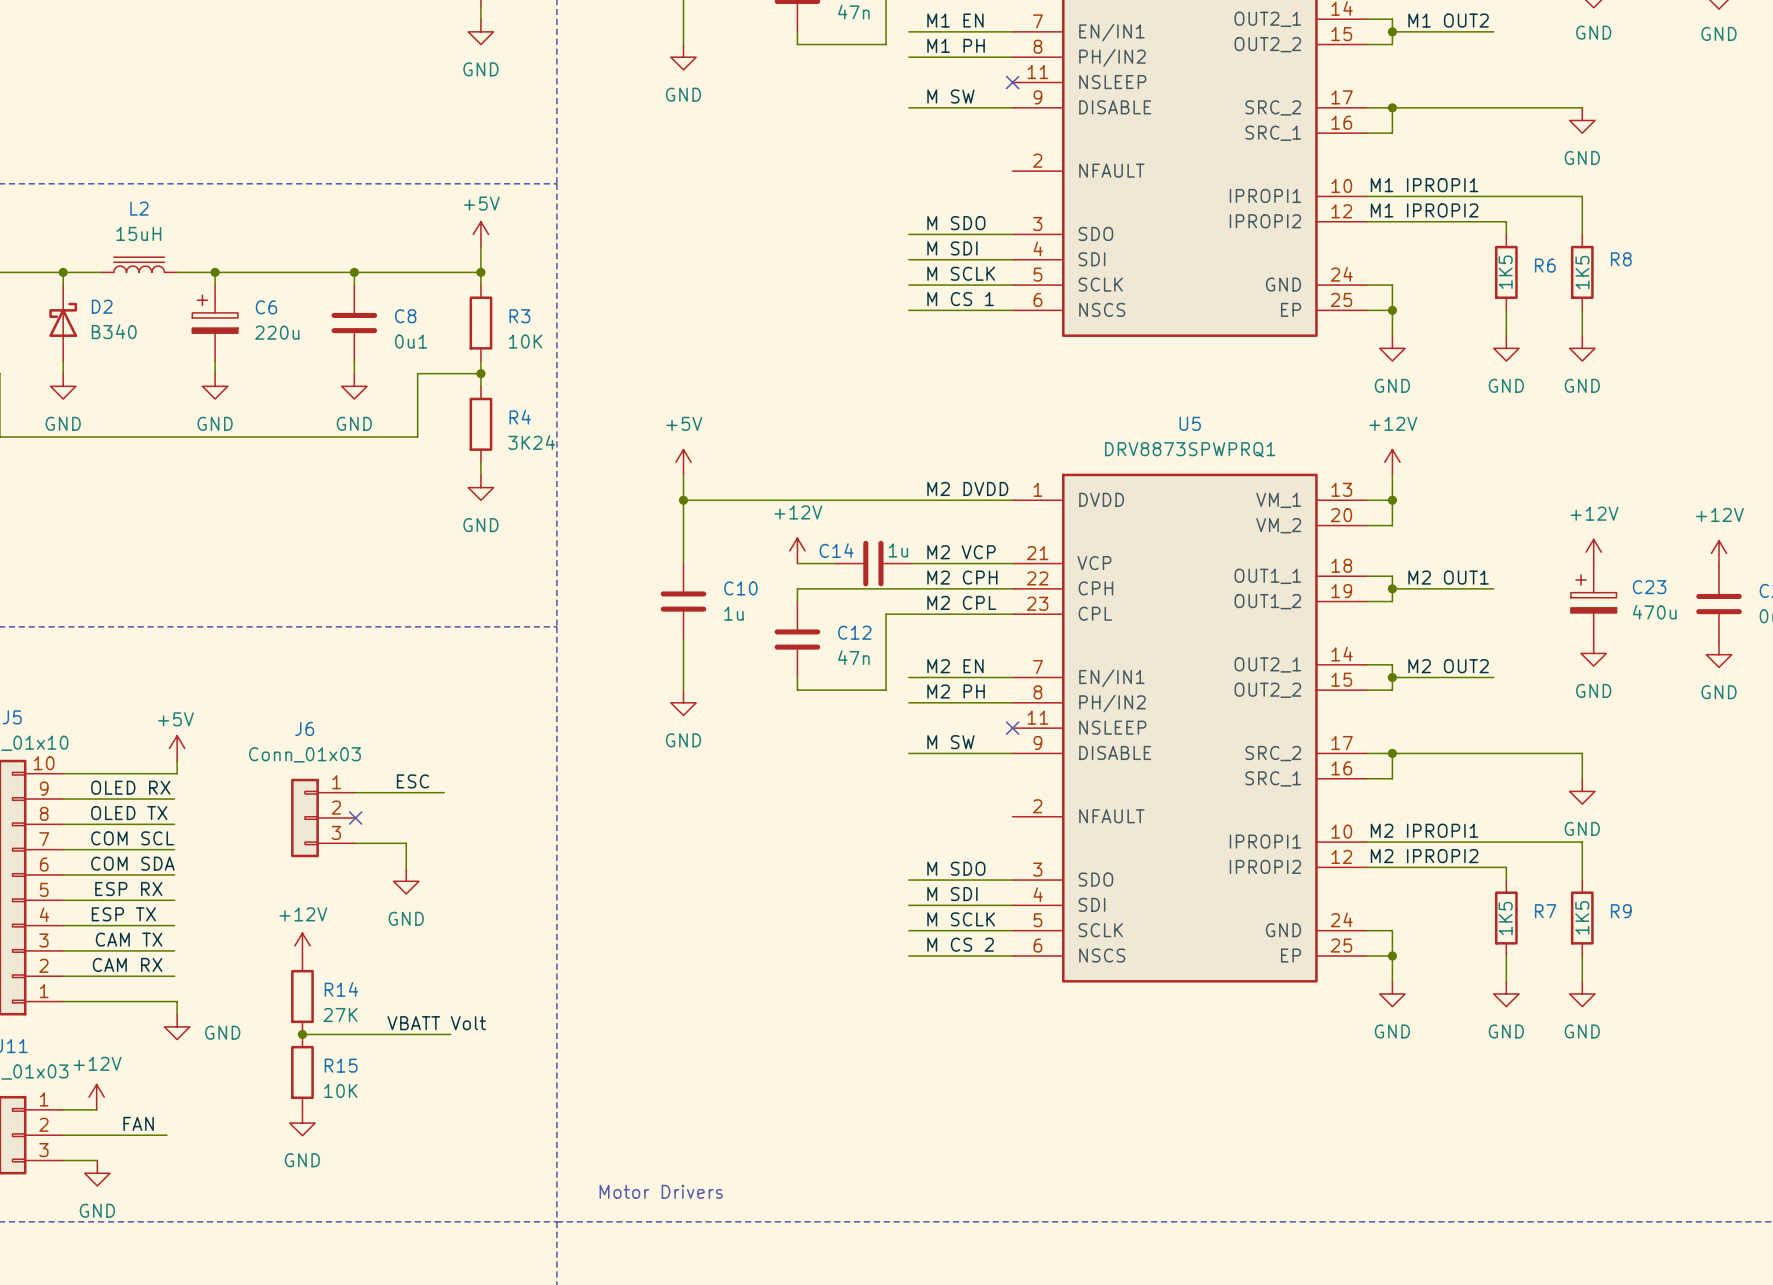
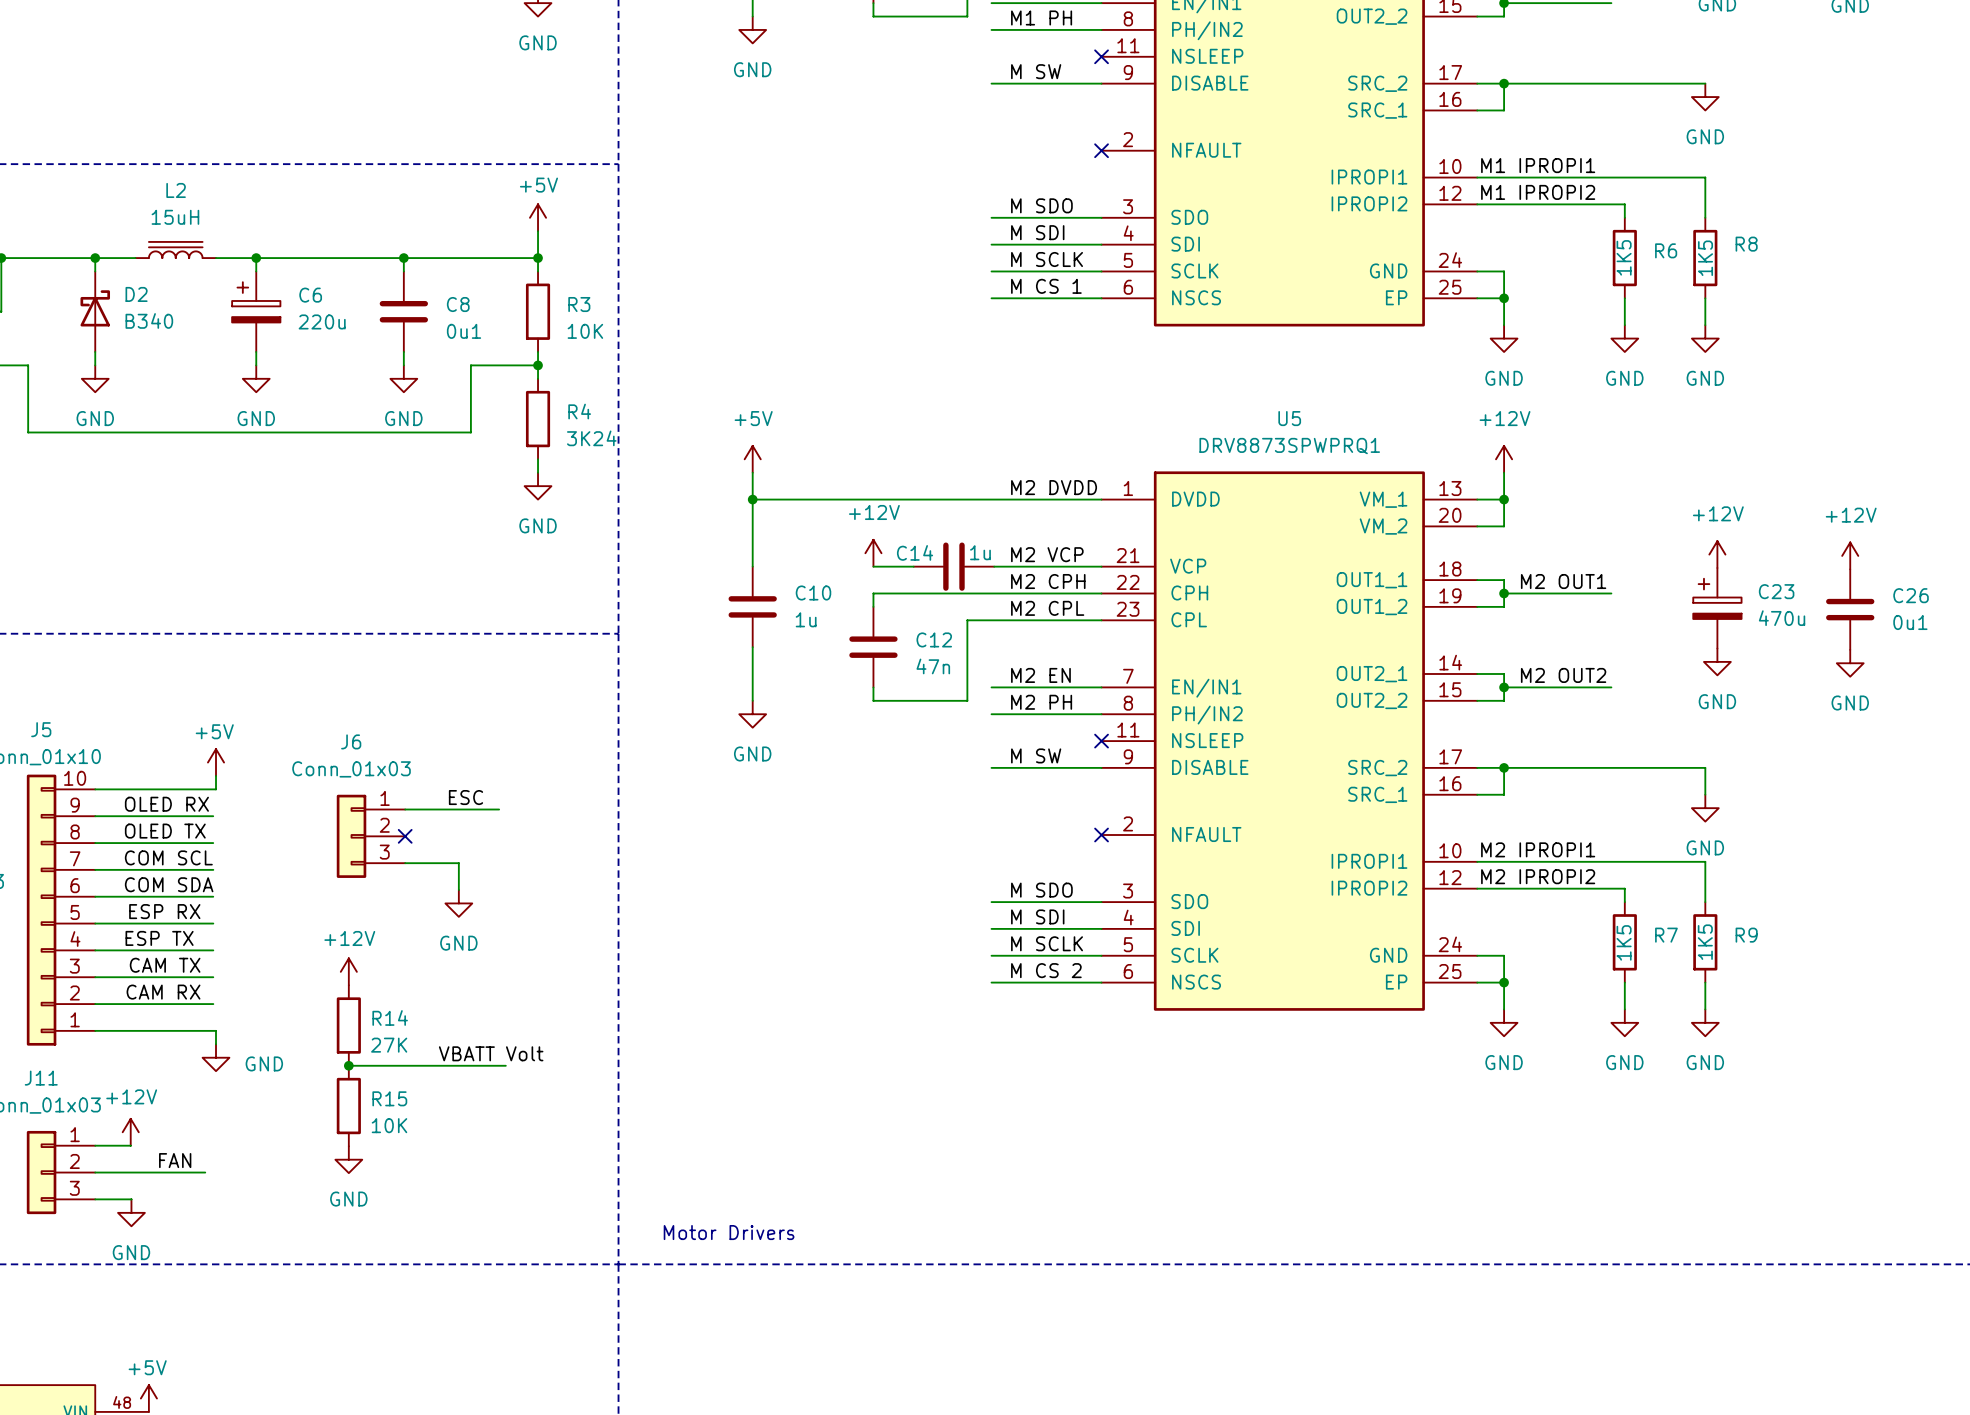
no-connect mark: none -> (1101, 150)
no-connect mark: none -> (1101, 835)

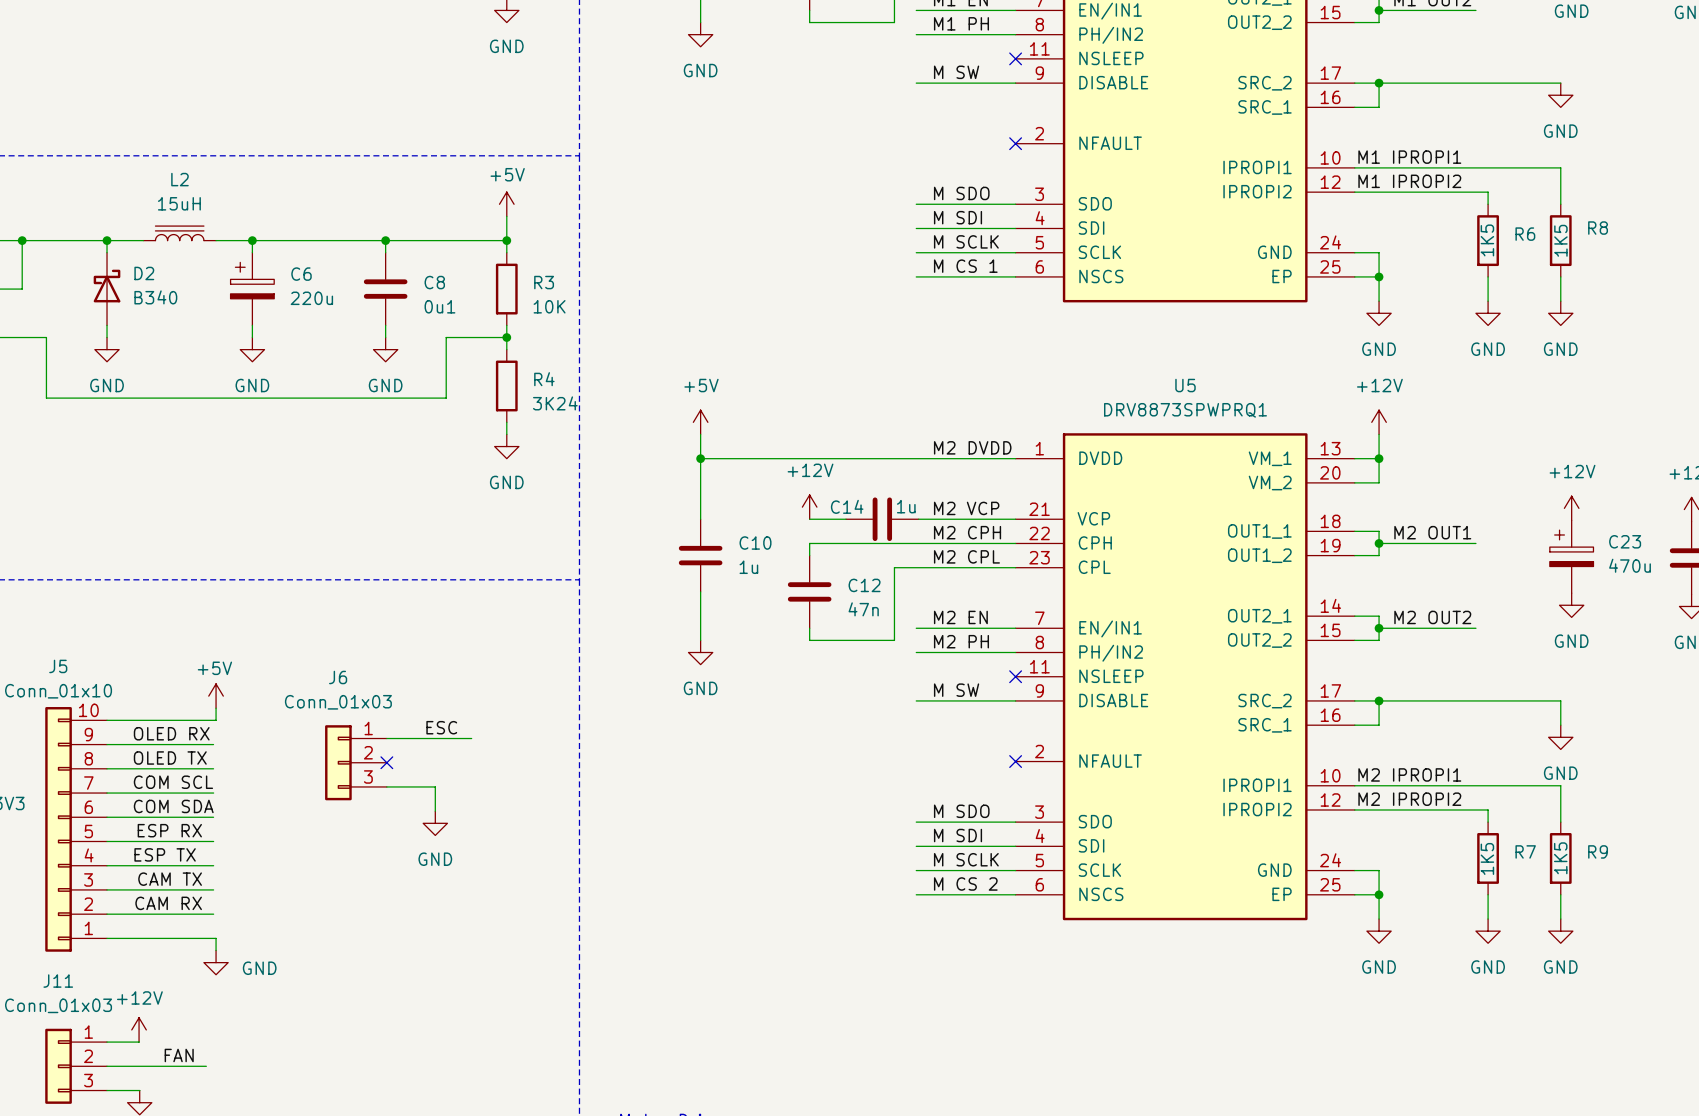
power symbol: +12V (348, 971) -> none
R14: 27K (348, 1025) -> none
label: VBATT Volt (491, 1053) -> none
wire: (348, 1065) (505, 1065) -> none
junction: (348, 1065) -> none
R15: 10K (348, 1106) -> none
power symbol: GND (348, 1159) -> none

